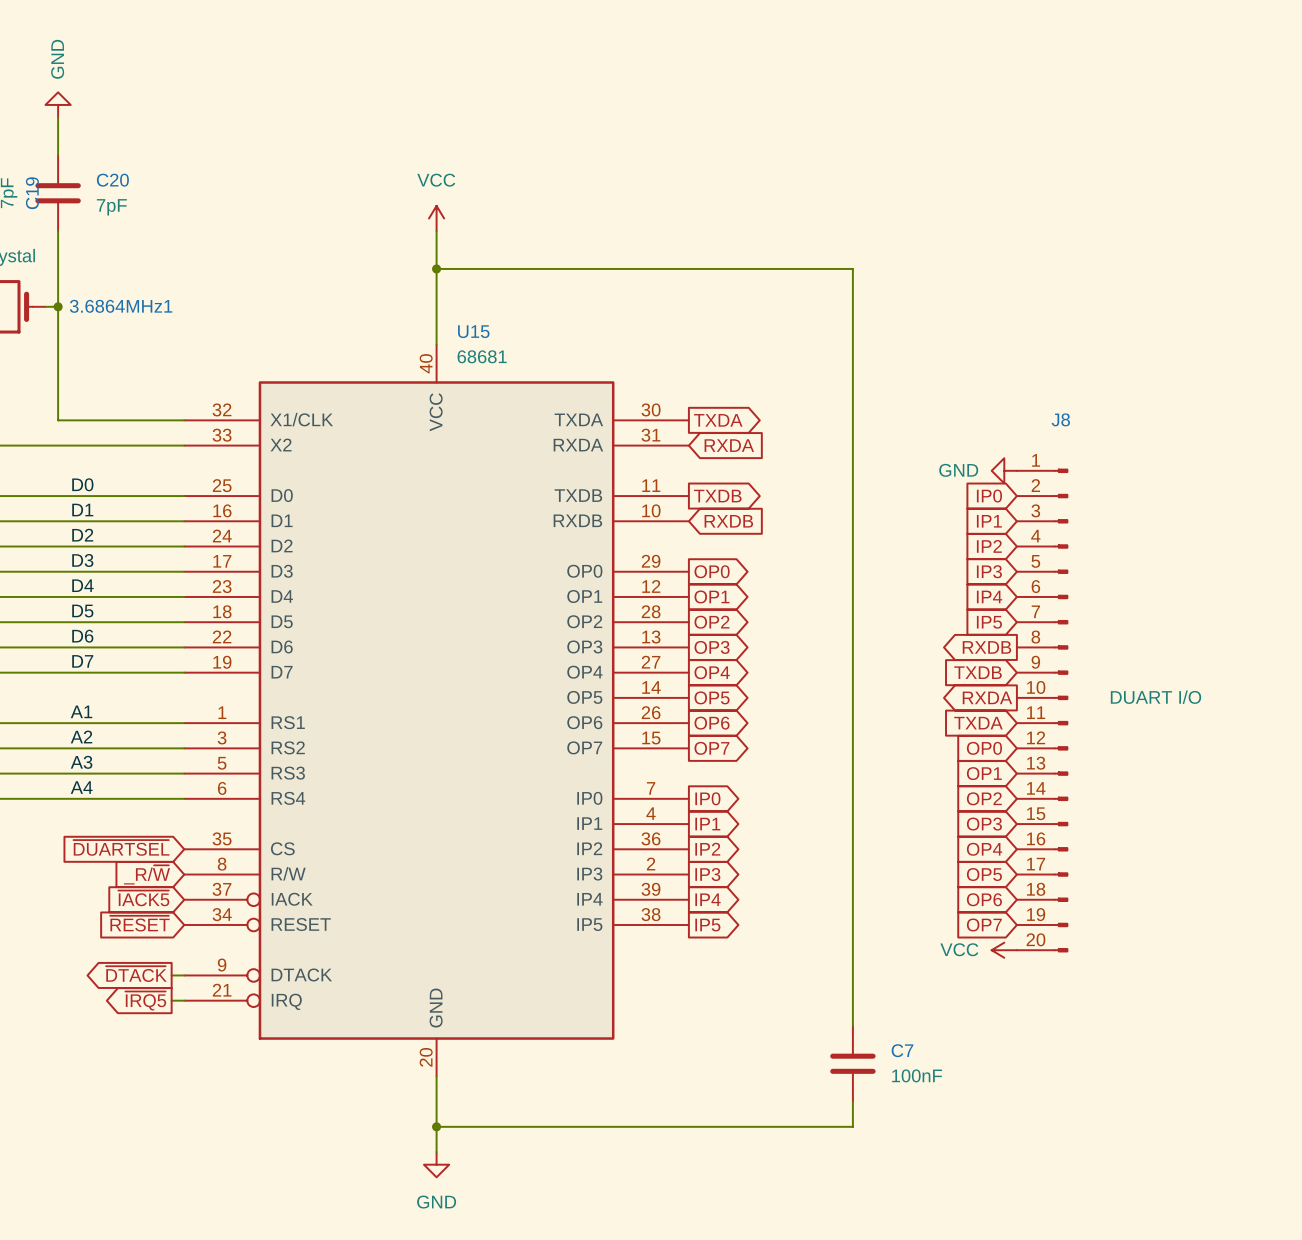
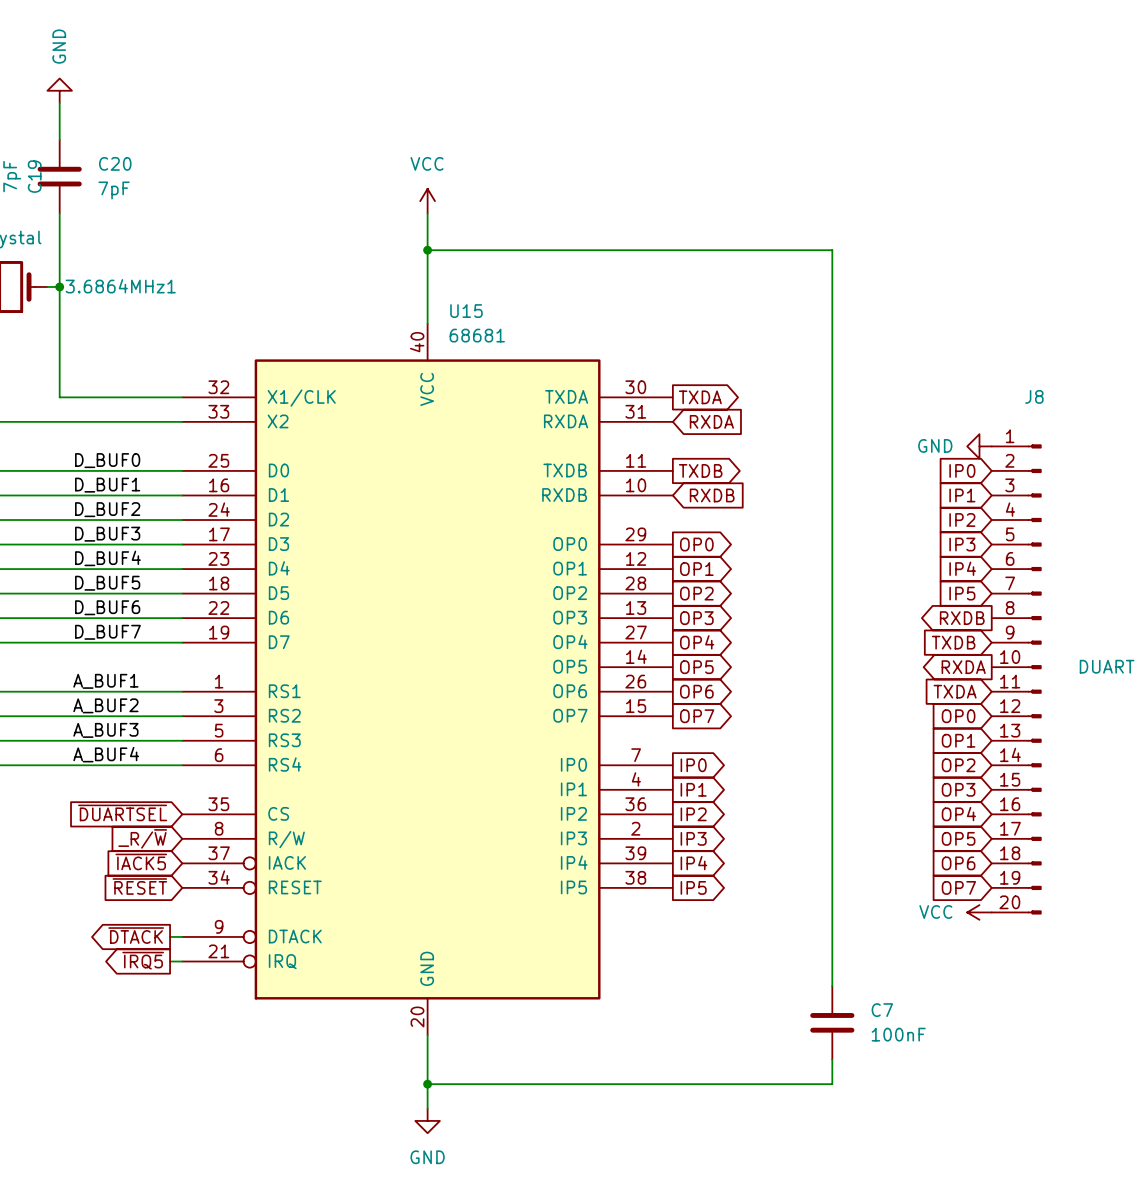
label: D0 (82, 484) -> D_BUF0 (107, 460)
label: D1 (82, 510) -> D_BUF1 (107, 485)
label: D2 (82, 535) -> D_BUF2 (107, 509)
label: D3 (82, 560) -> D_BUF3 (107, 534)
label: D4 (82, 585) -> D_BUF4 (107, 558)
label: D5 (82, 611) -> D_BUF5 (107, 583)
label: D6 (82, 636) -> D_BUF6 (107, 607)
label: D7 (82, 661) -> D_BUF7 (107, 632)
label: A1 (81, 711) -> A_BUF1 (105, 681)
label: A2 (81, 737) -> A_BUF2 (105, 705)
label: A3 (81, 762) -> A_BUF3 (105, 730)
label: A4 (81, 787) -> A_BUF4 (106, 754)

